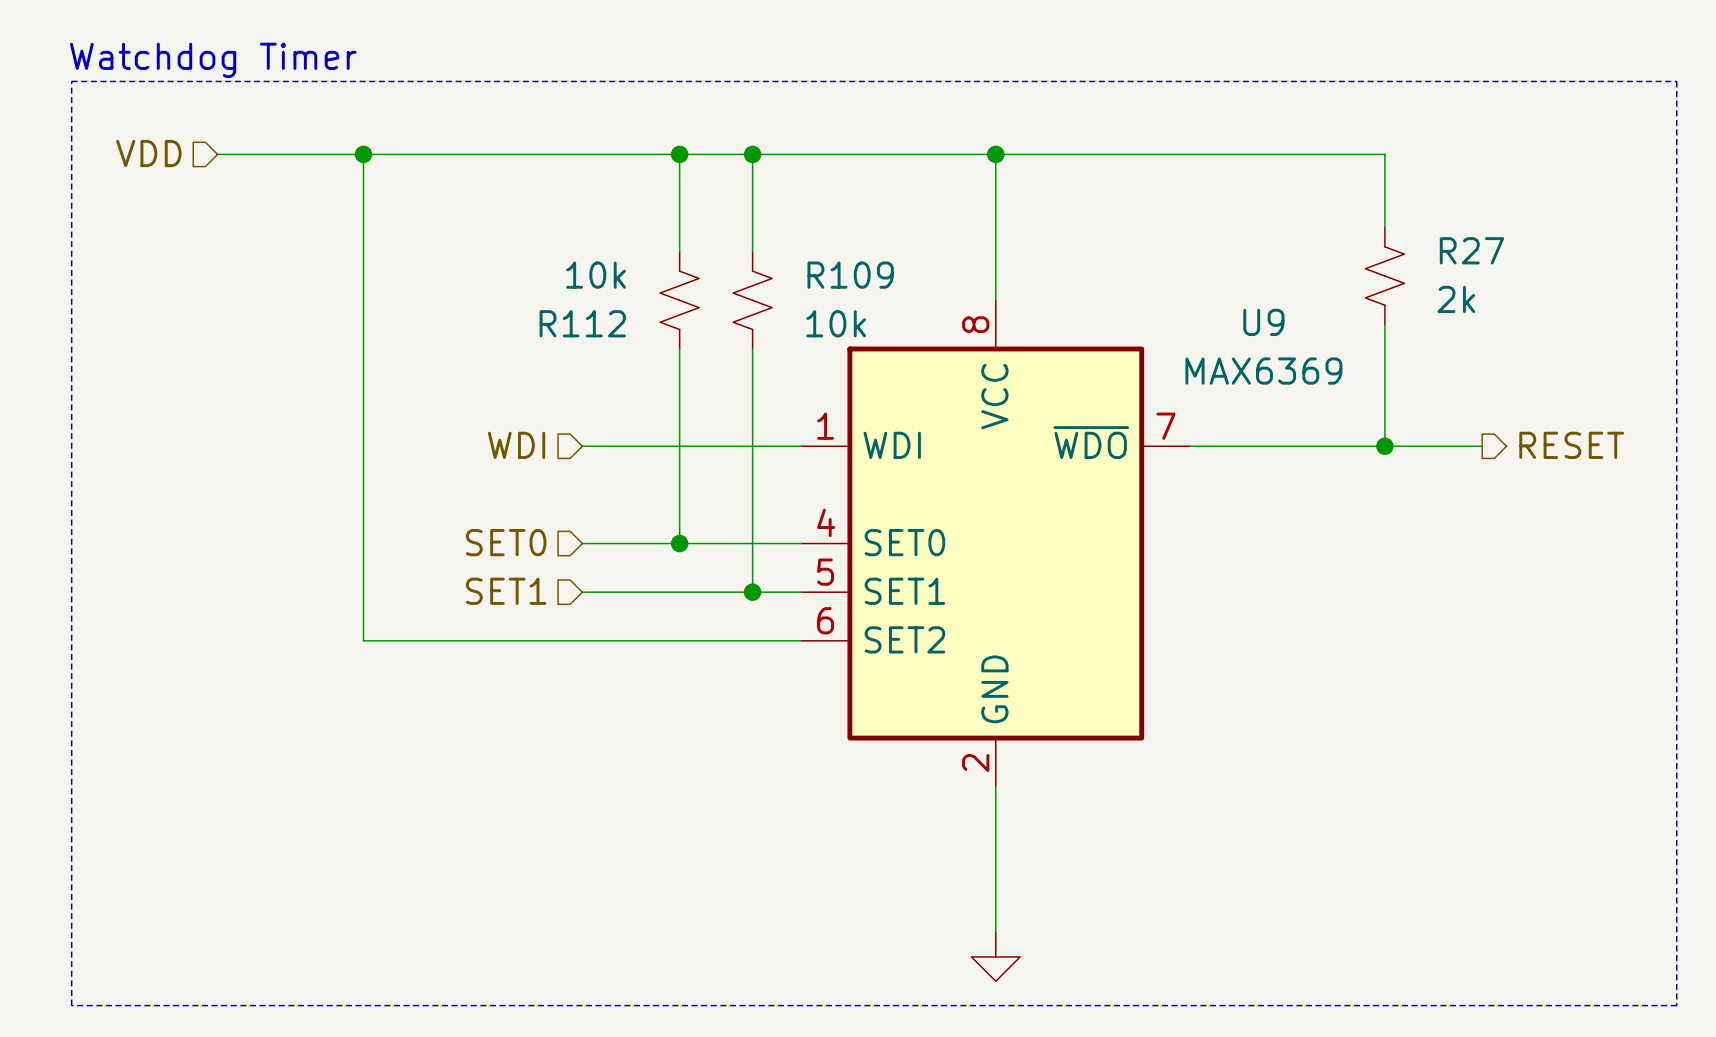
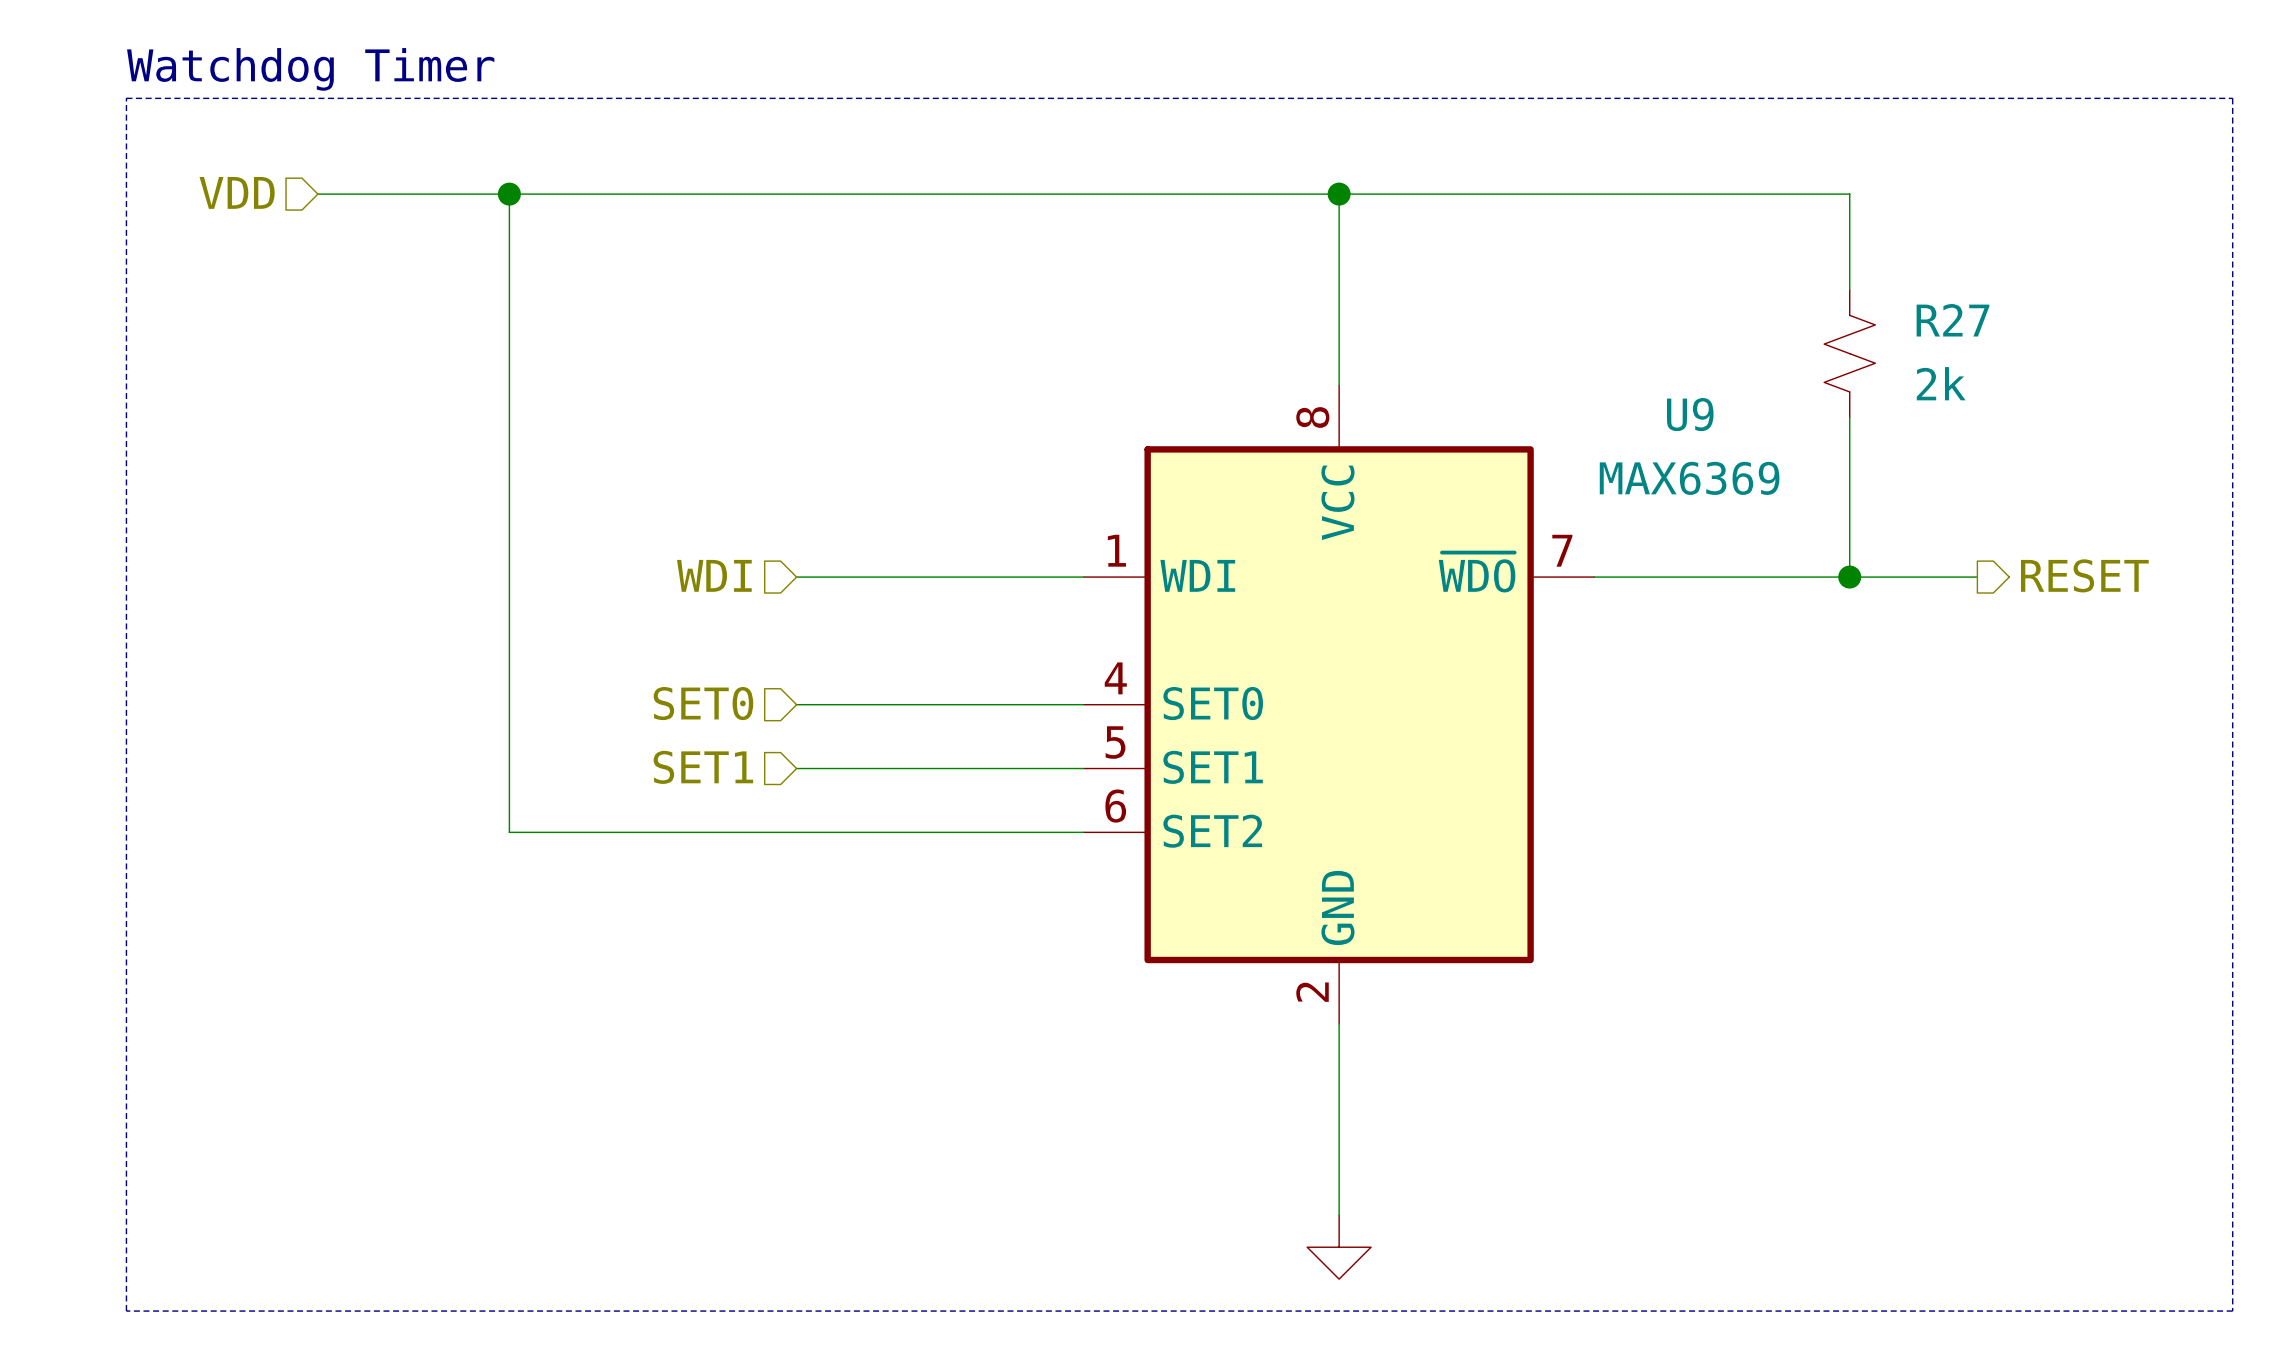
wire: (679, 154) (679, 251) -> none
junction: (679, 154) -> none
wire: (752, 154) (752, 251) -> none
junction: (752, 154) -> none
R112: 10k (679, 300) -> none
R109: 10k (752, 300) -> none
wire: (679, 348) (679, 543) -> none
wire: (752, 348) (752, 592) -> none
junction: (679, 543) -> none
junction: (752, 592) -> none

